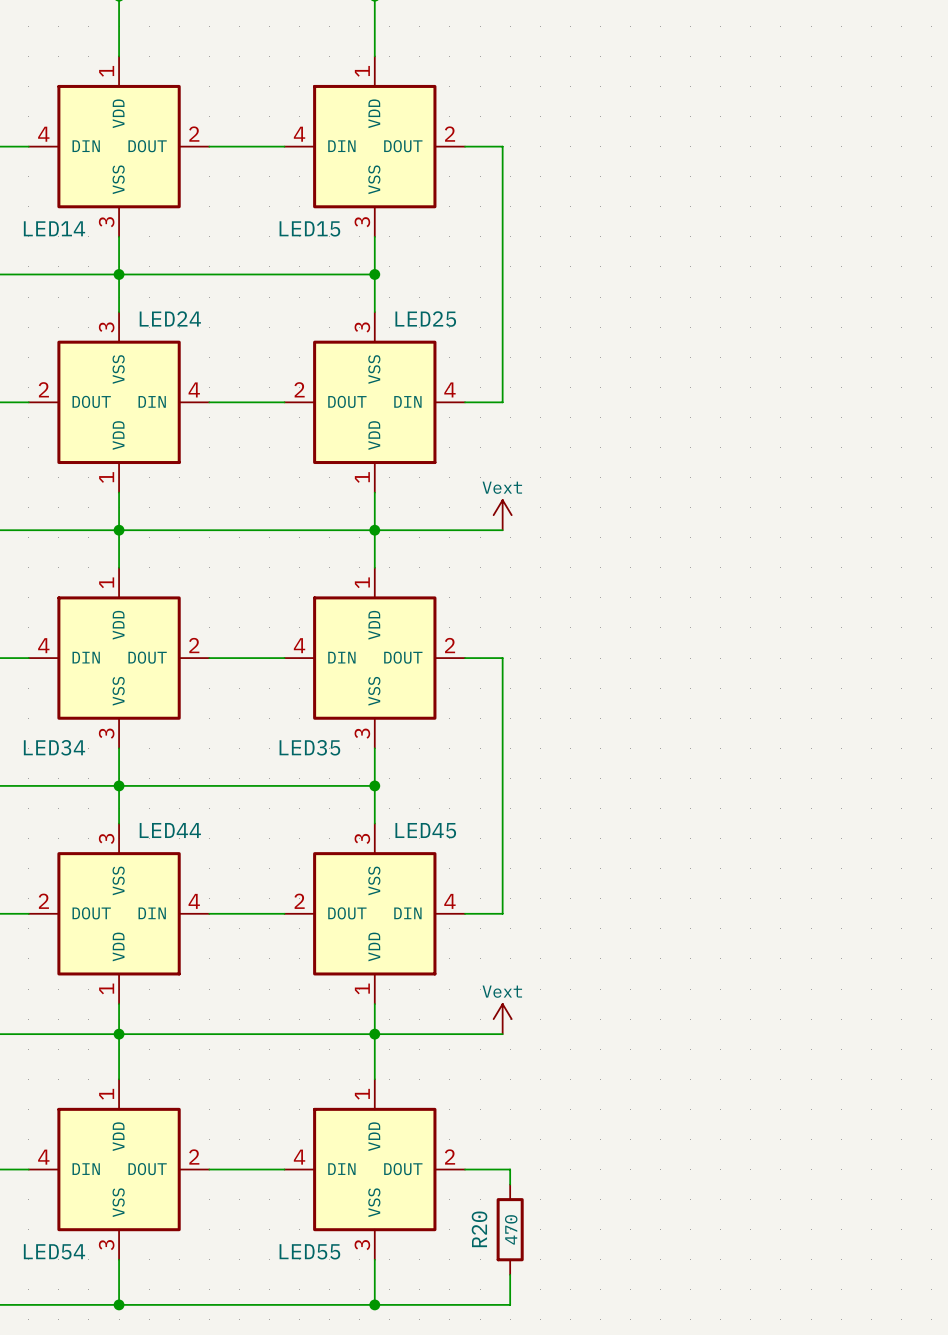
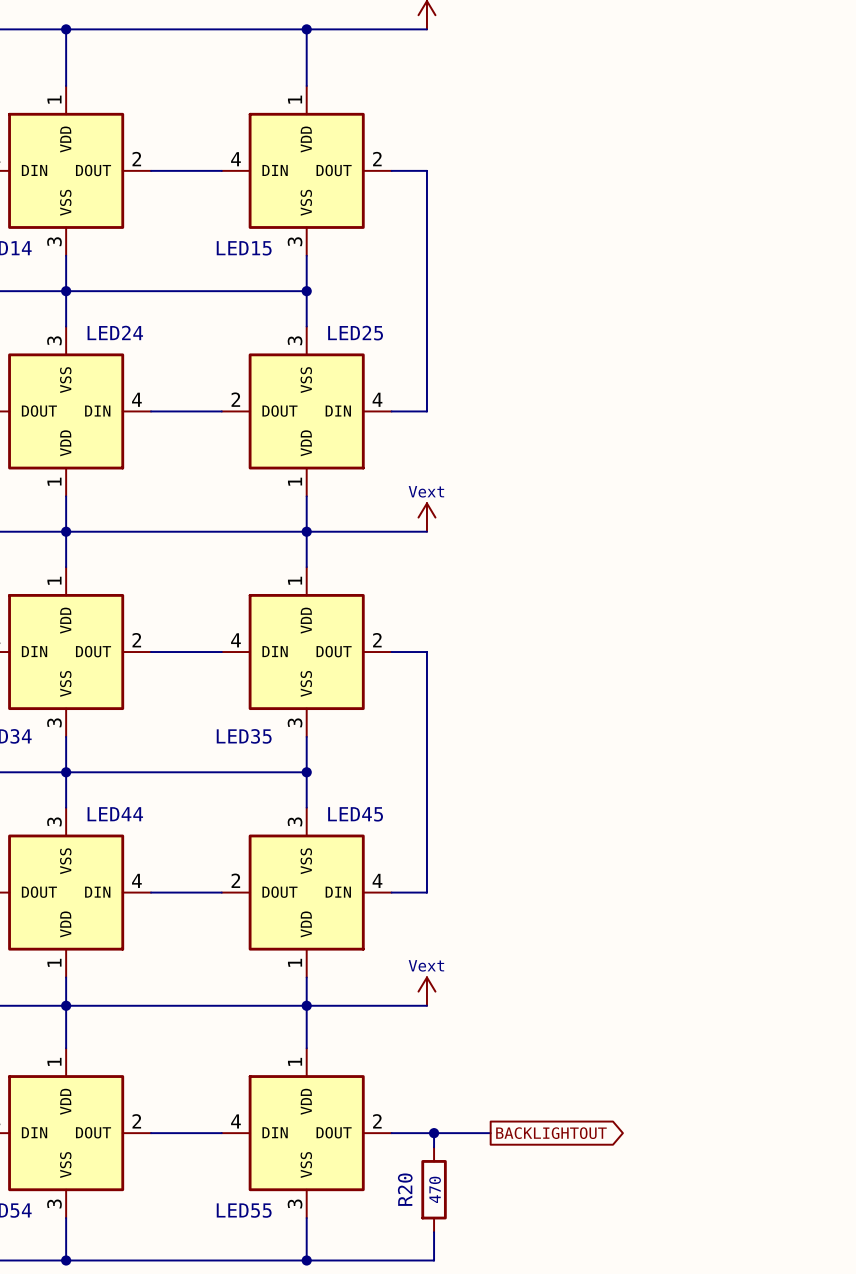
wire: none -> (434, 1133) (490, 1133)
junction: none -> (434, 1133)
global label: none -> BACKLIGHTOUT (551, 1133)

